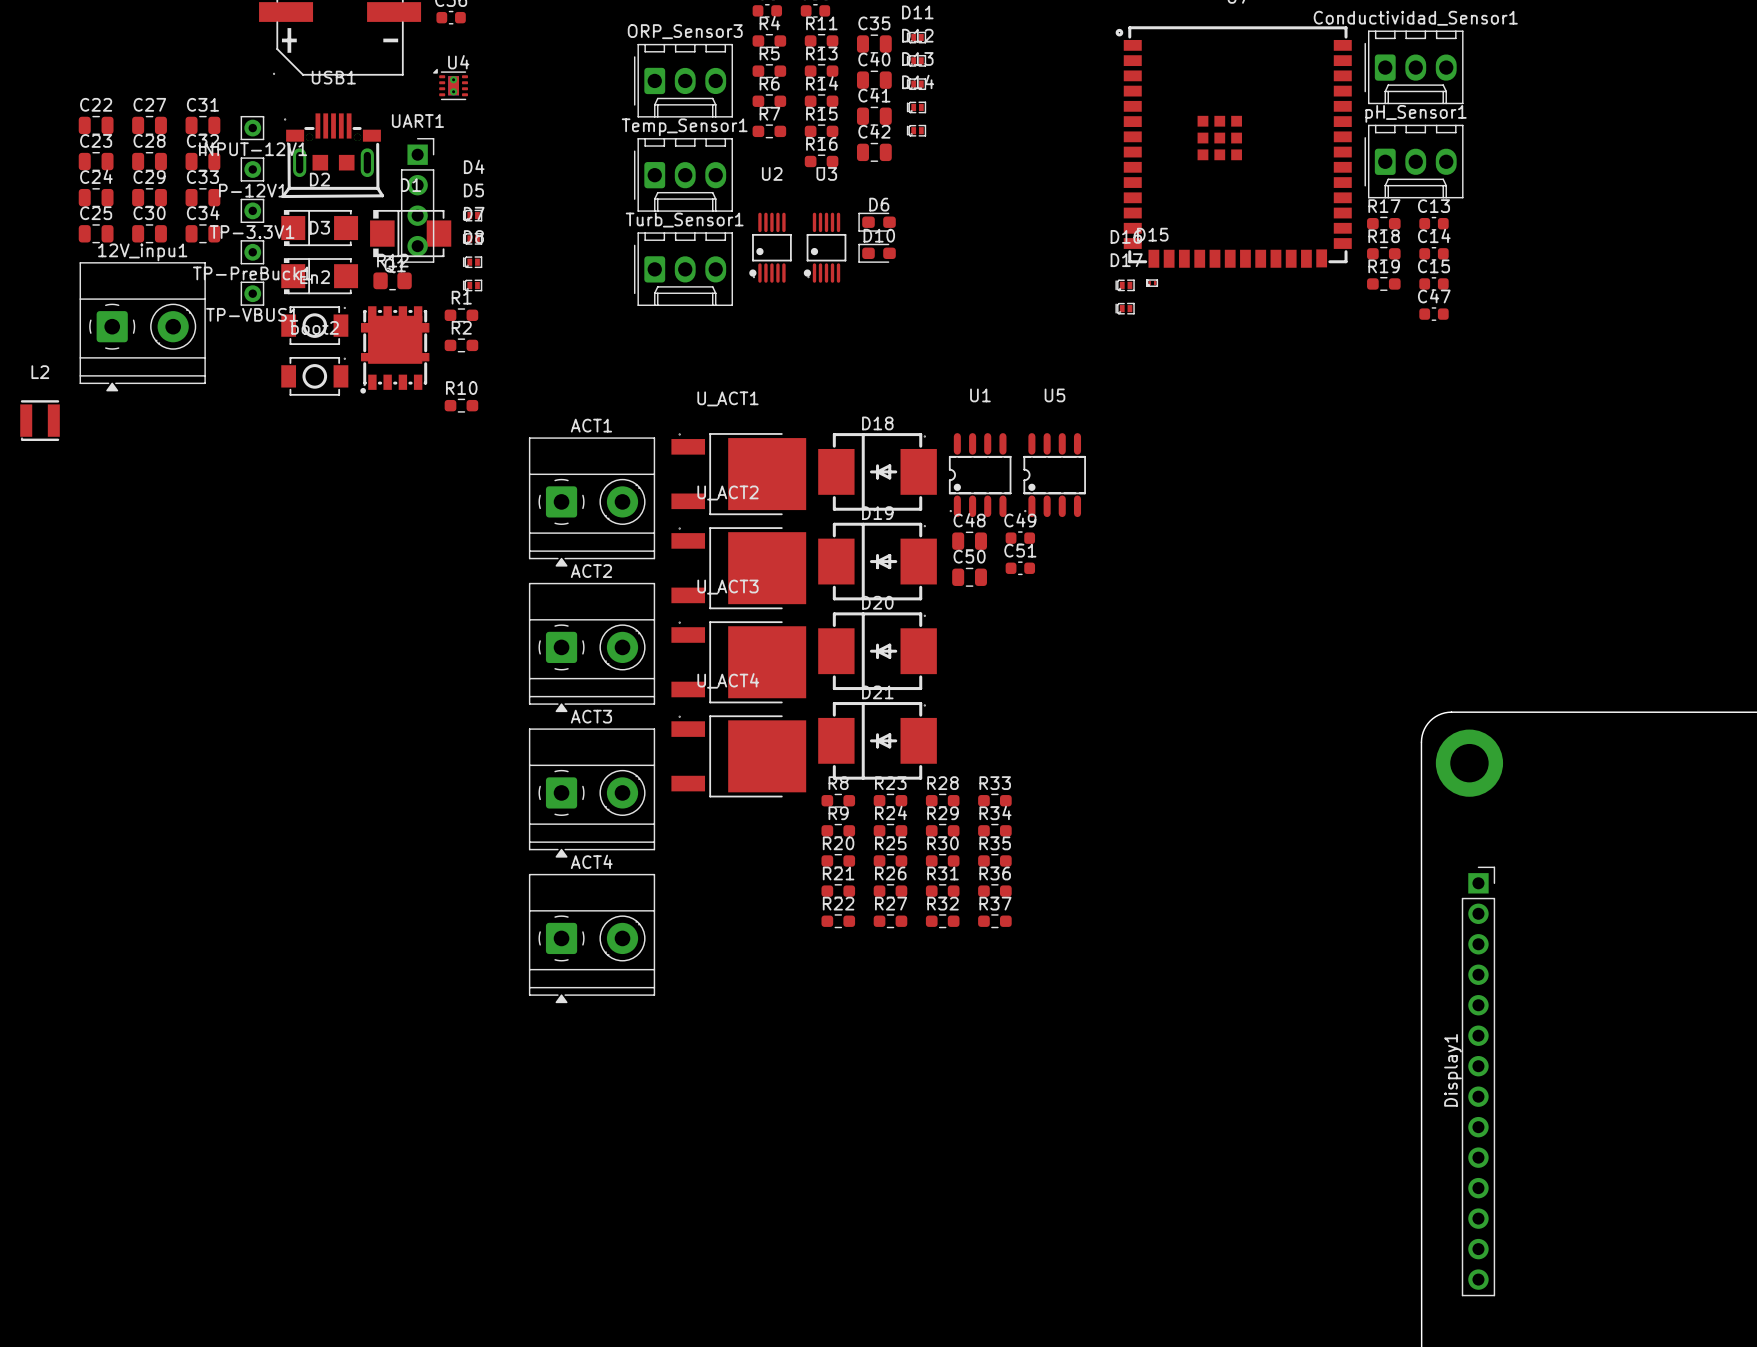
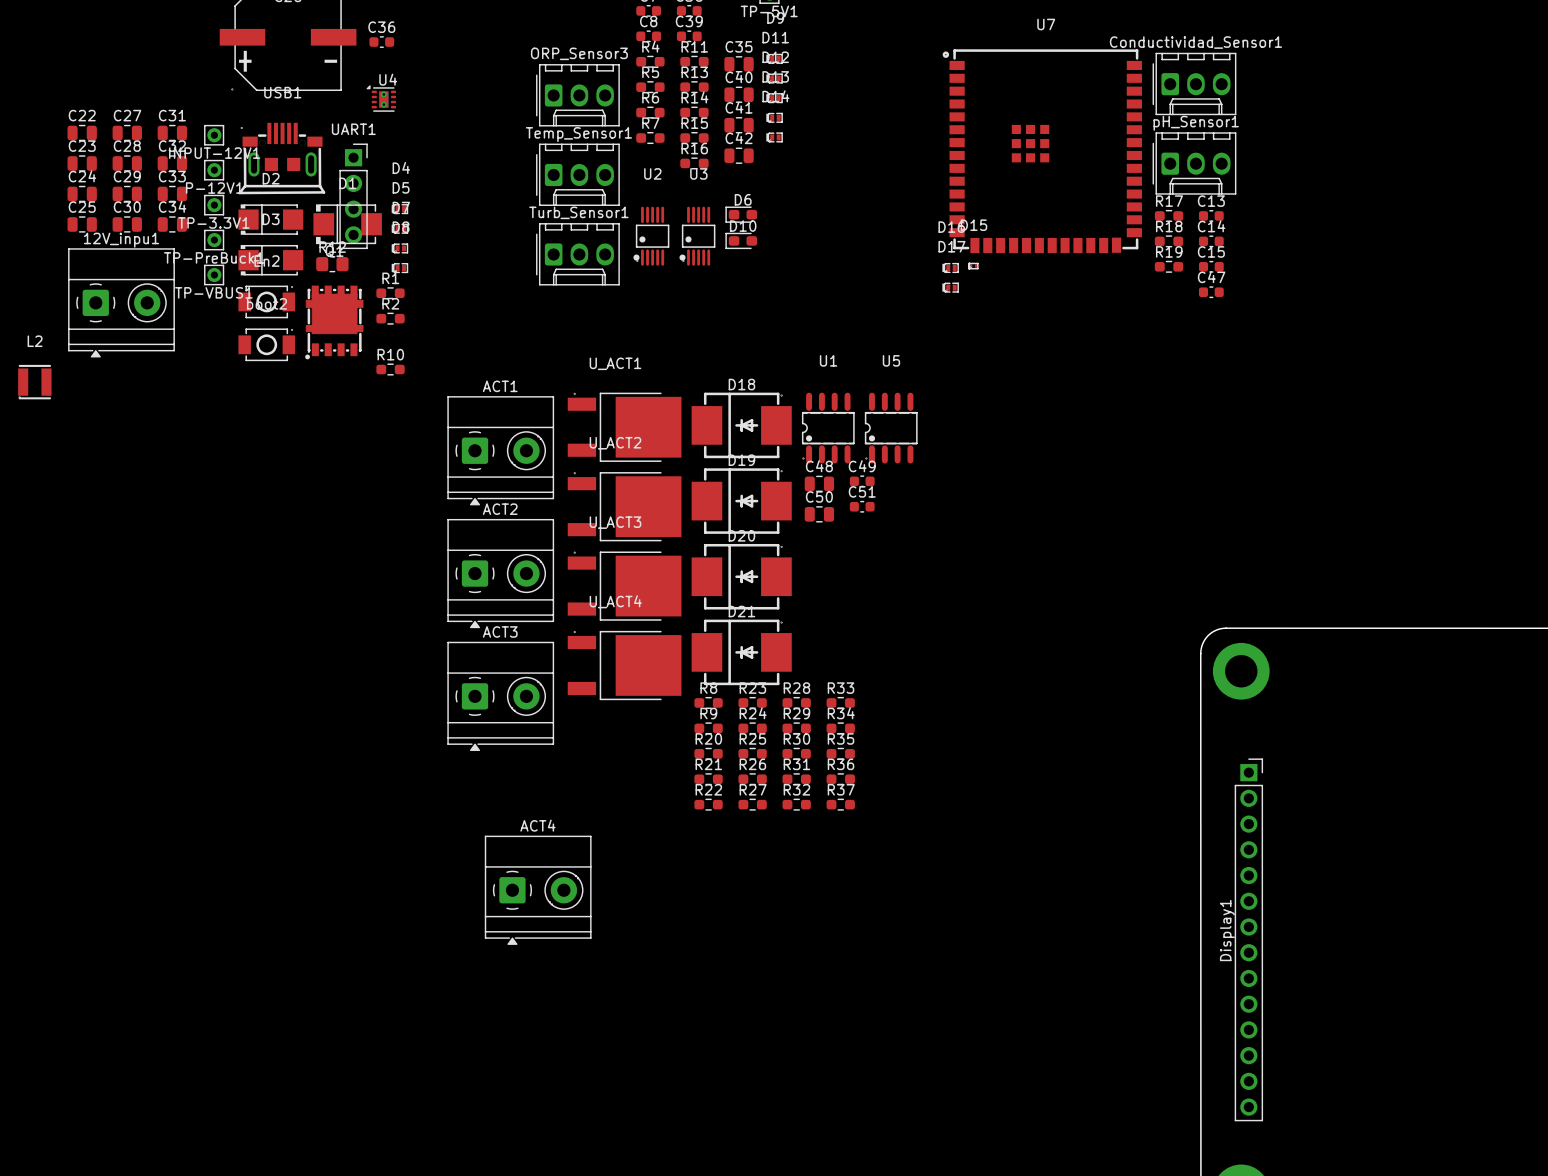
ACT4 position: (592, 938) -> (538, 890)

